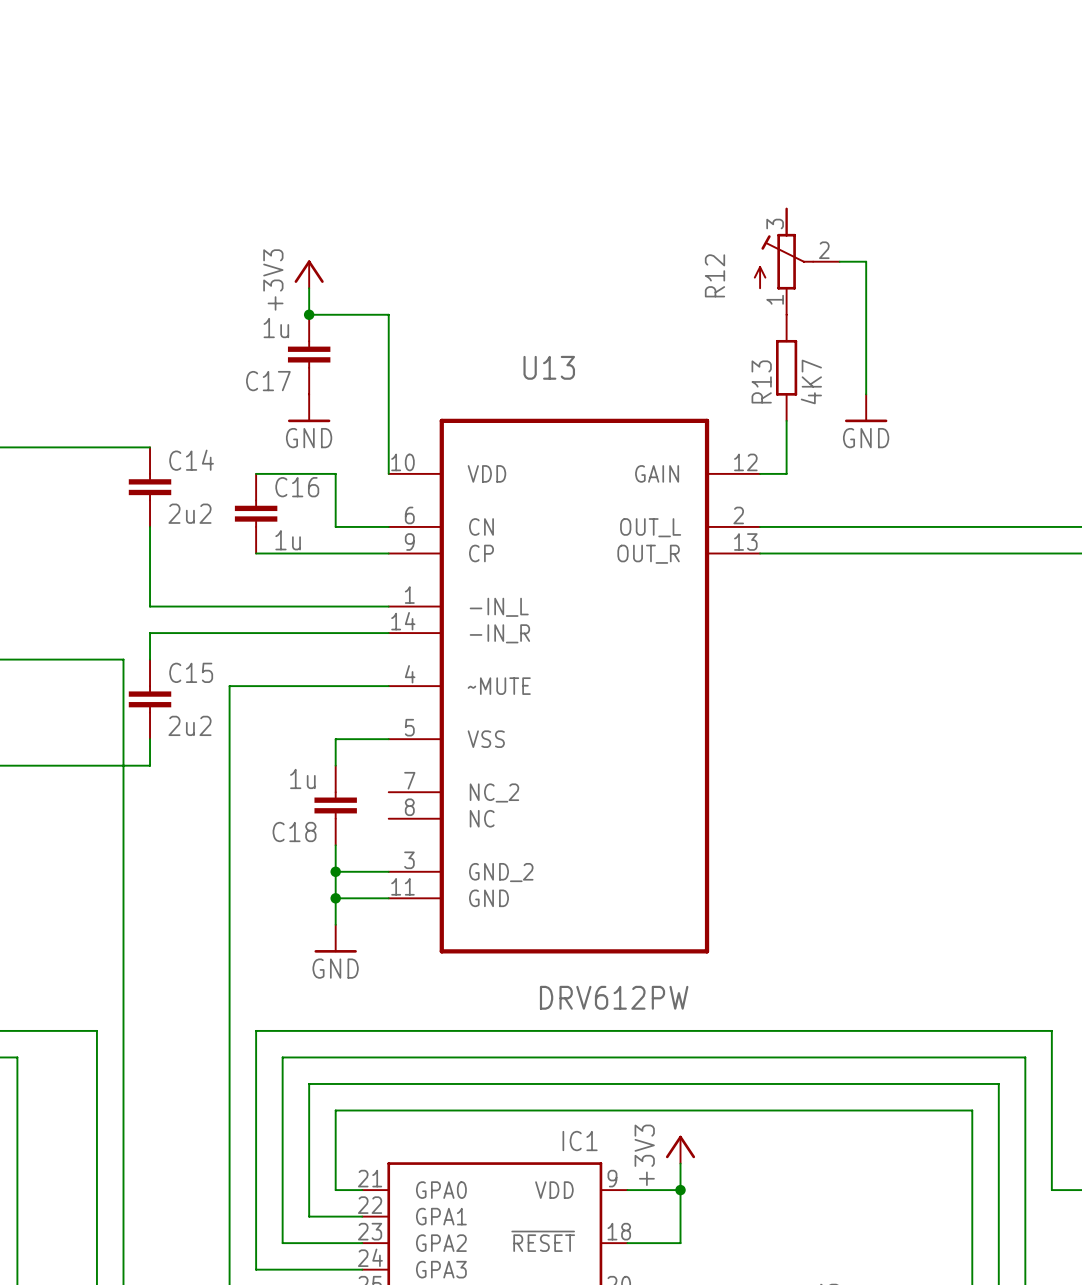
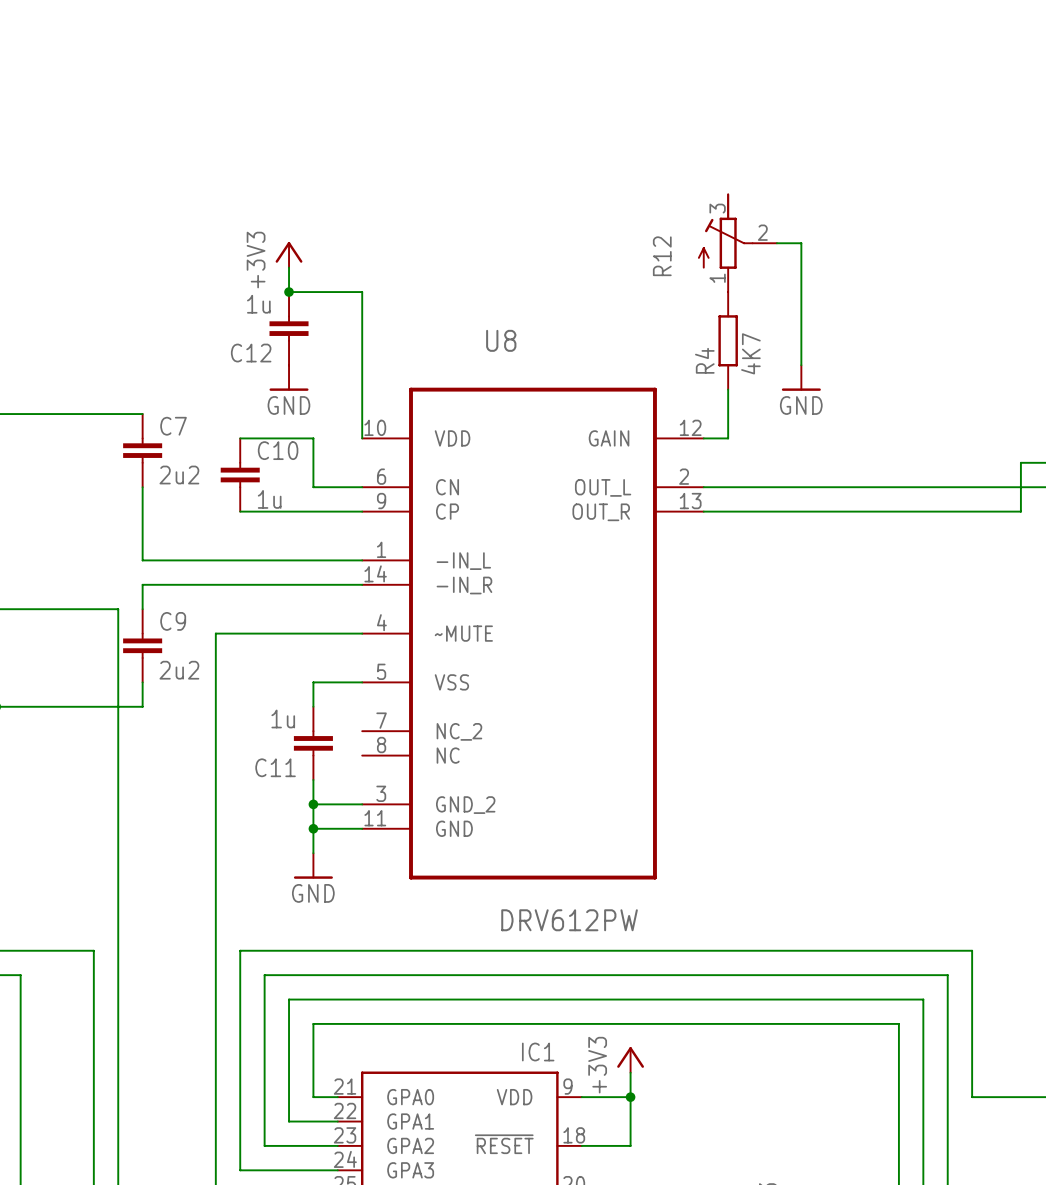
U13 name: U13 (549, 367) -> U8 (501, 340)
C17 name: C17 (268, 381) -> C12 (251, 353)
R13 name: R13 (761, 381) -> R4 (704, 360)
C14 name: C14 (191, 460) -> C7 (173, 426)
C16 name: C16 (297, 487) -> C10 (278, 450)
C15 name: C15 (191, 672) -> C9 (173, 621)
C18 name: C18 (294, 832) -> C11 (275, 767)

